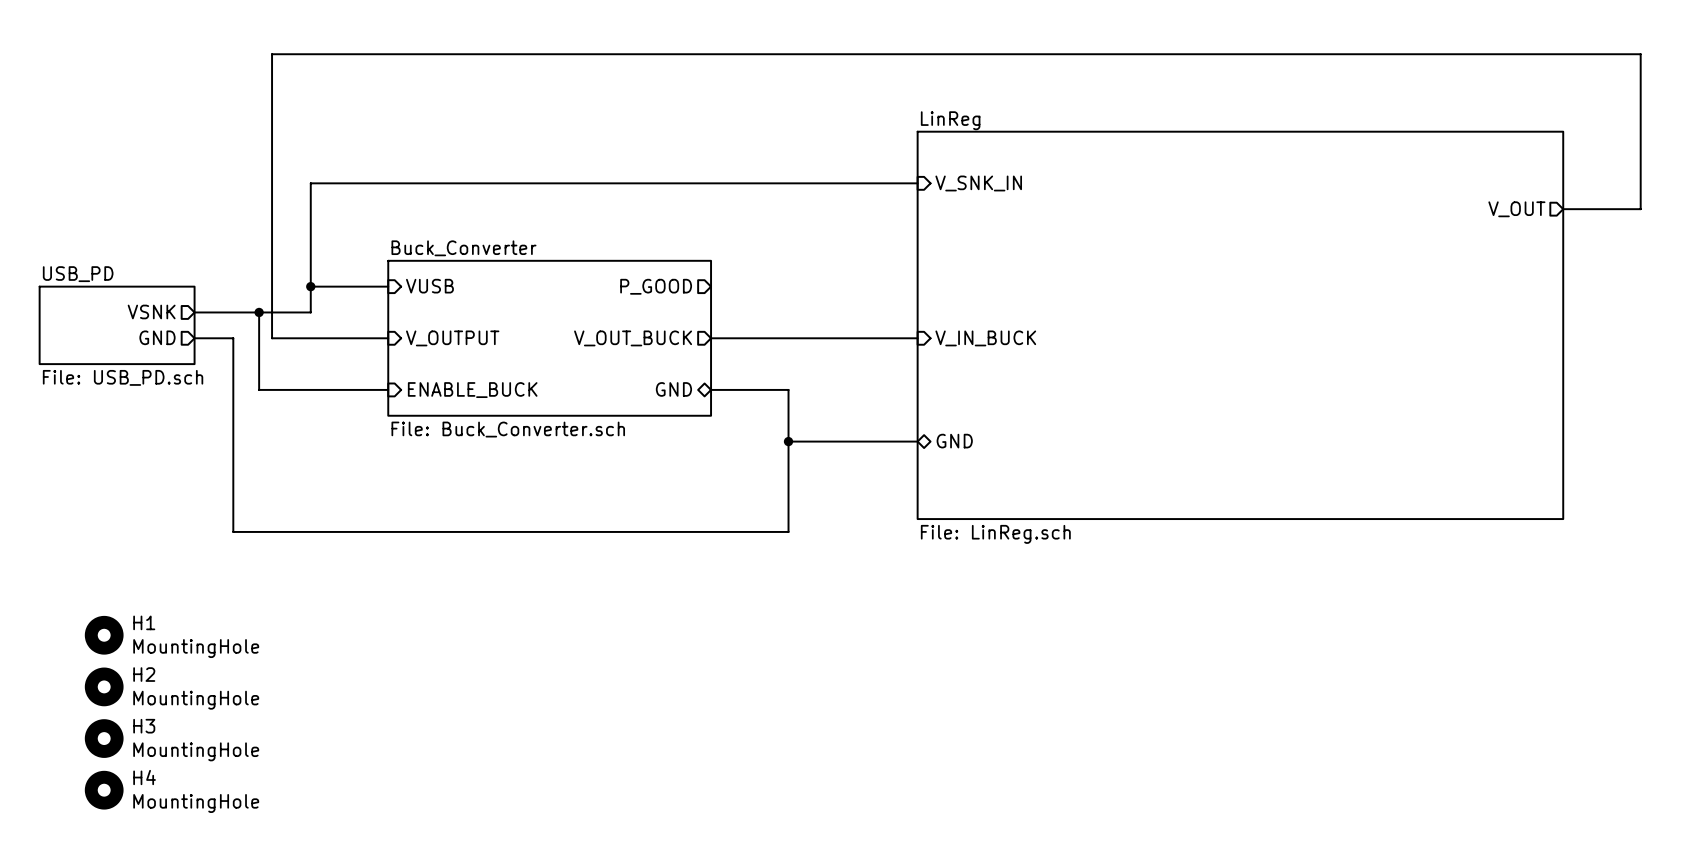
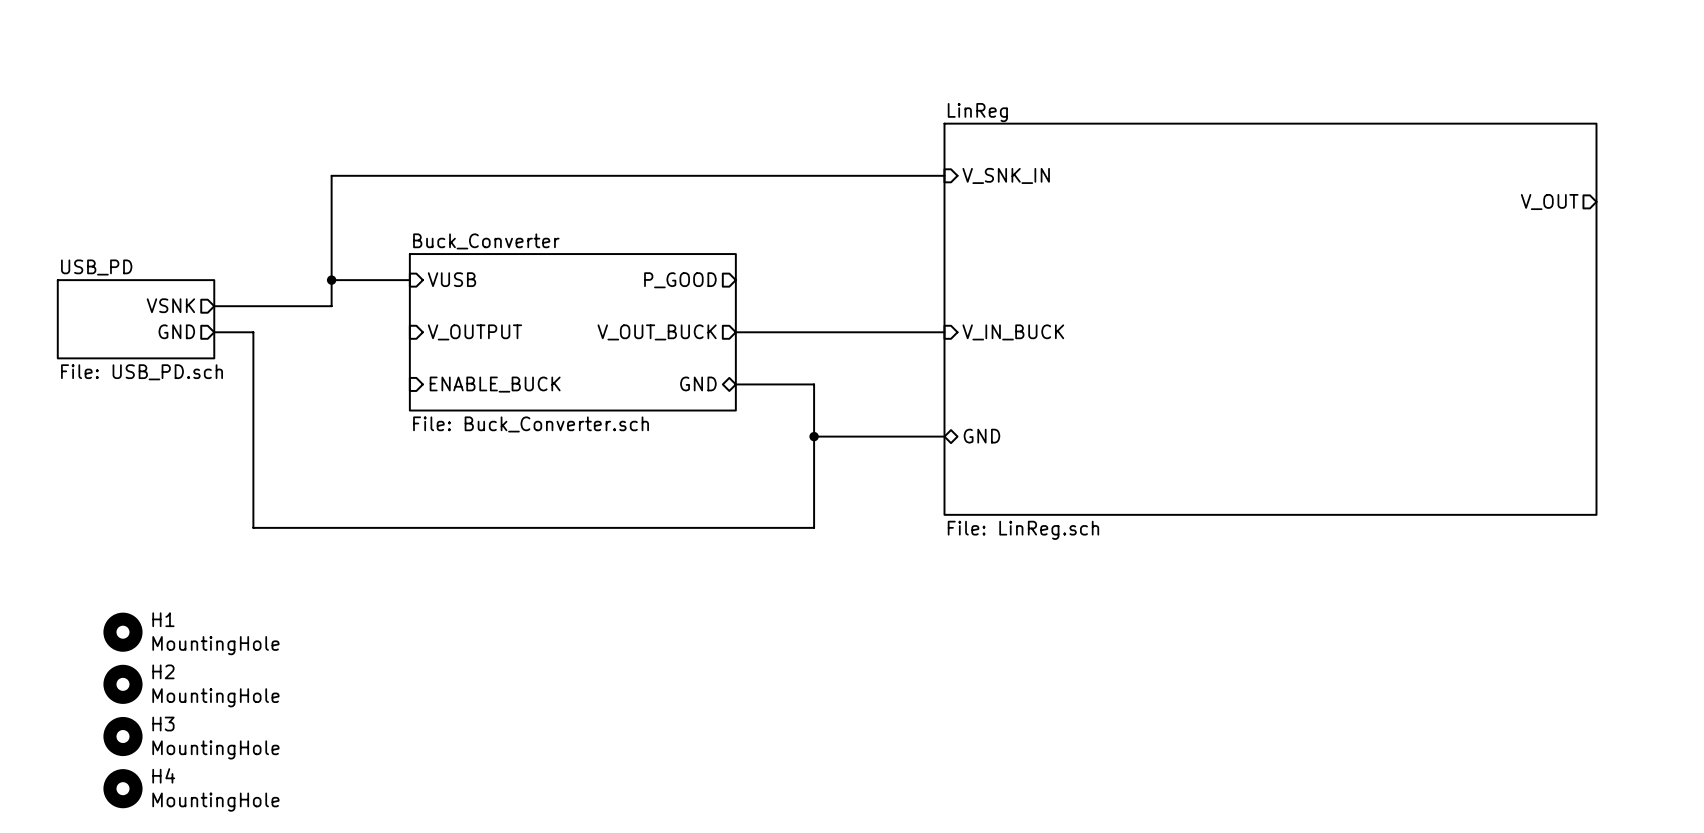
wire: (1563, 209) (1640, 209) (1640, 54) (272, 54) (272, 338) (388, 338) -> none
wire: (259, 312) (259, 389) (388, 389) -> none
junction: (259, 312) -> none

